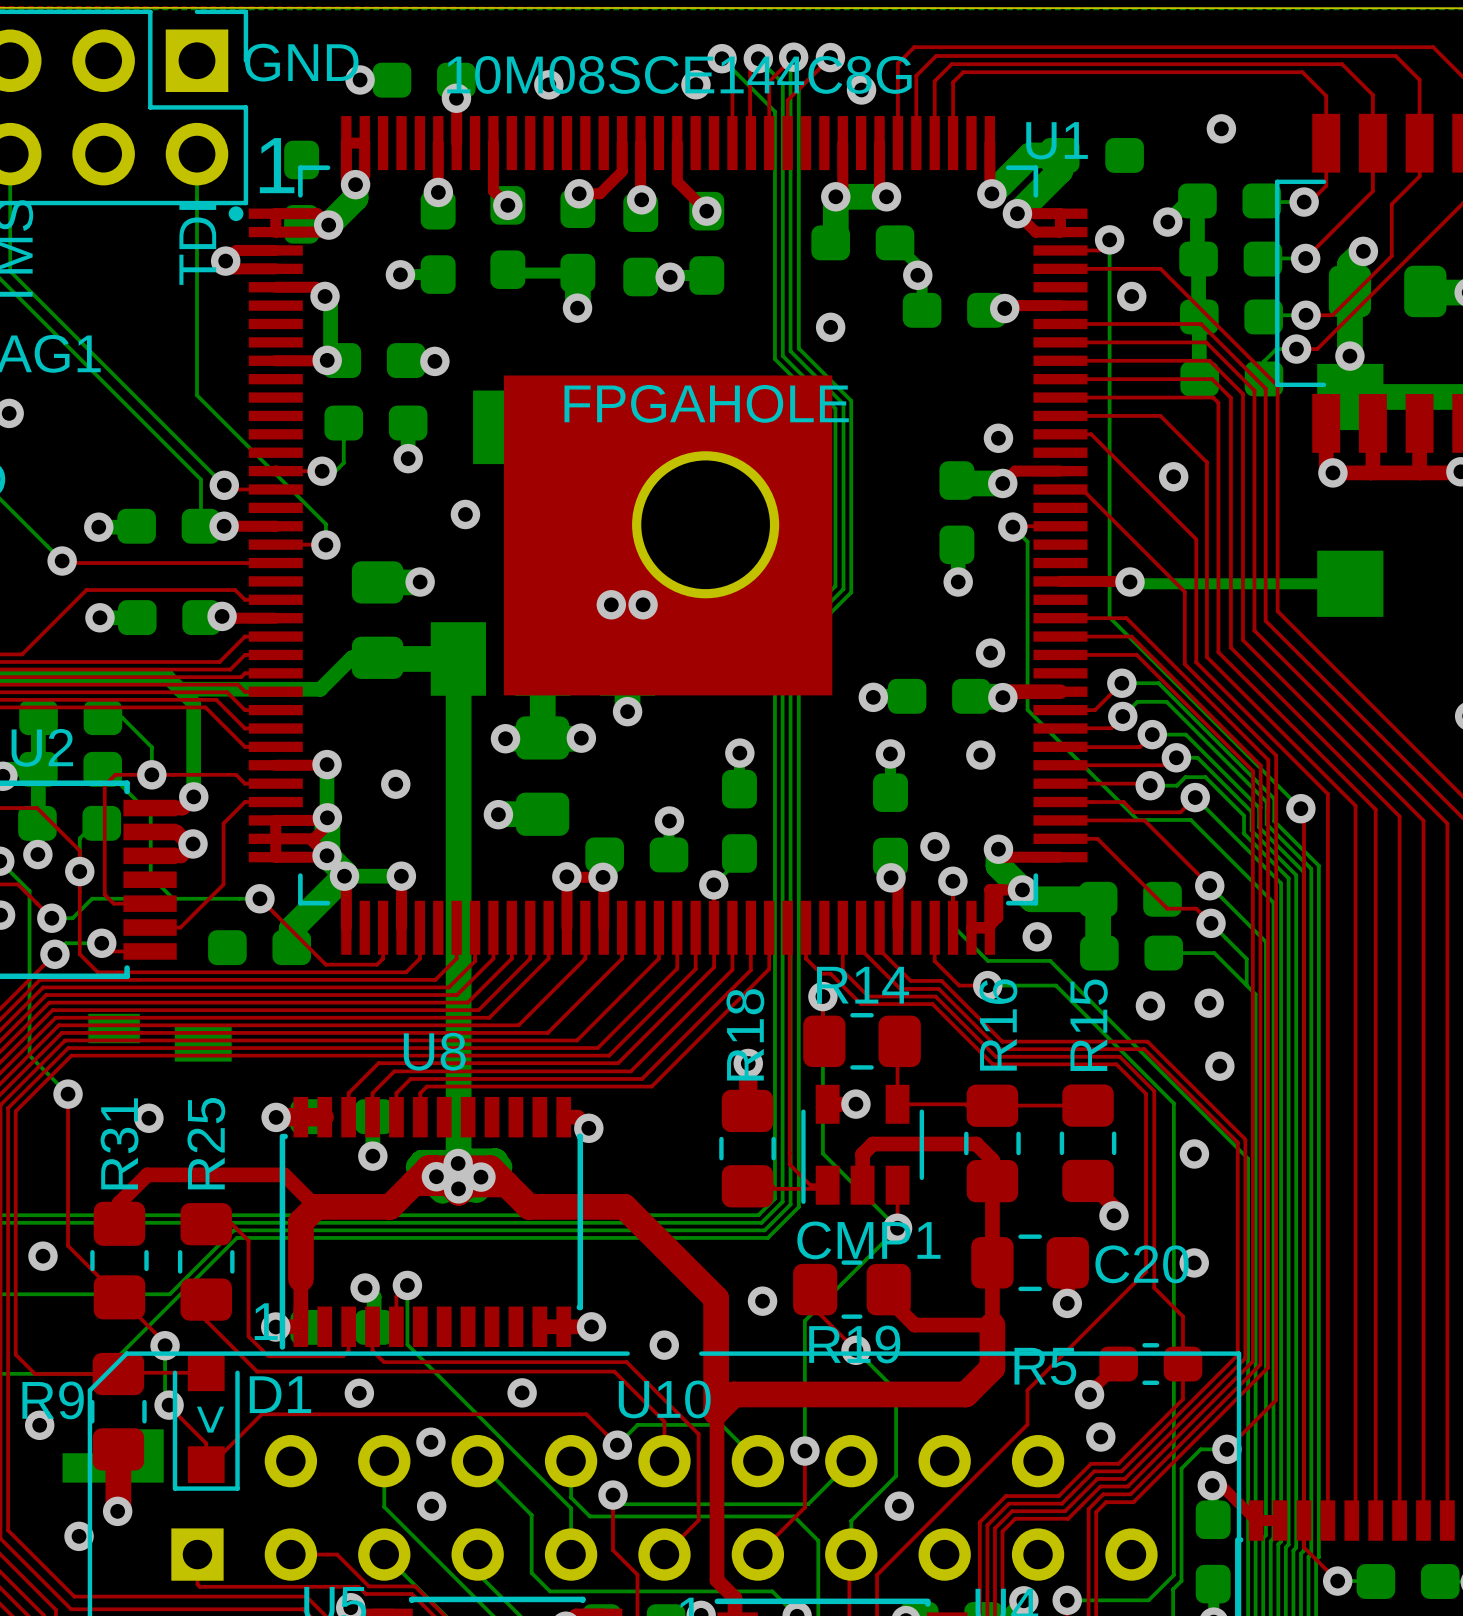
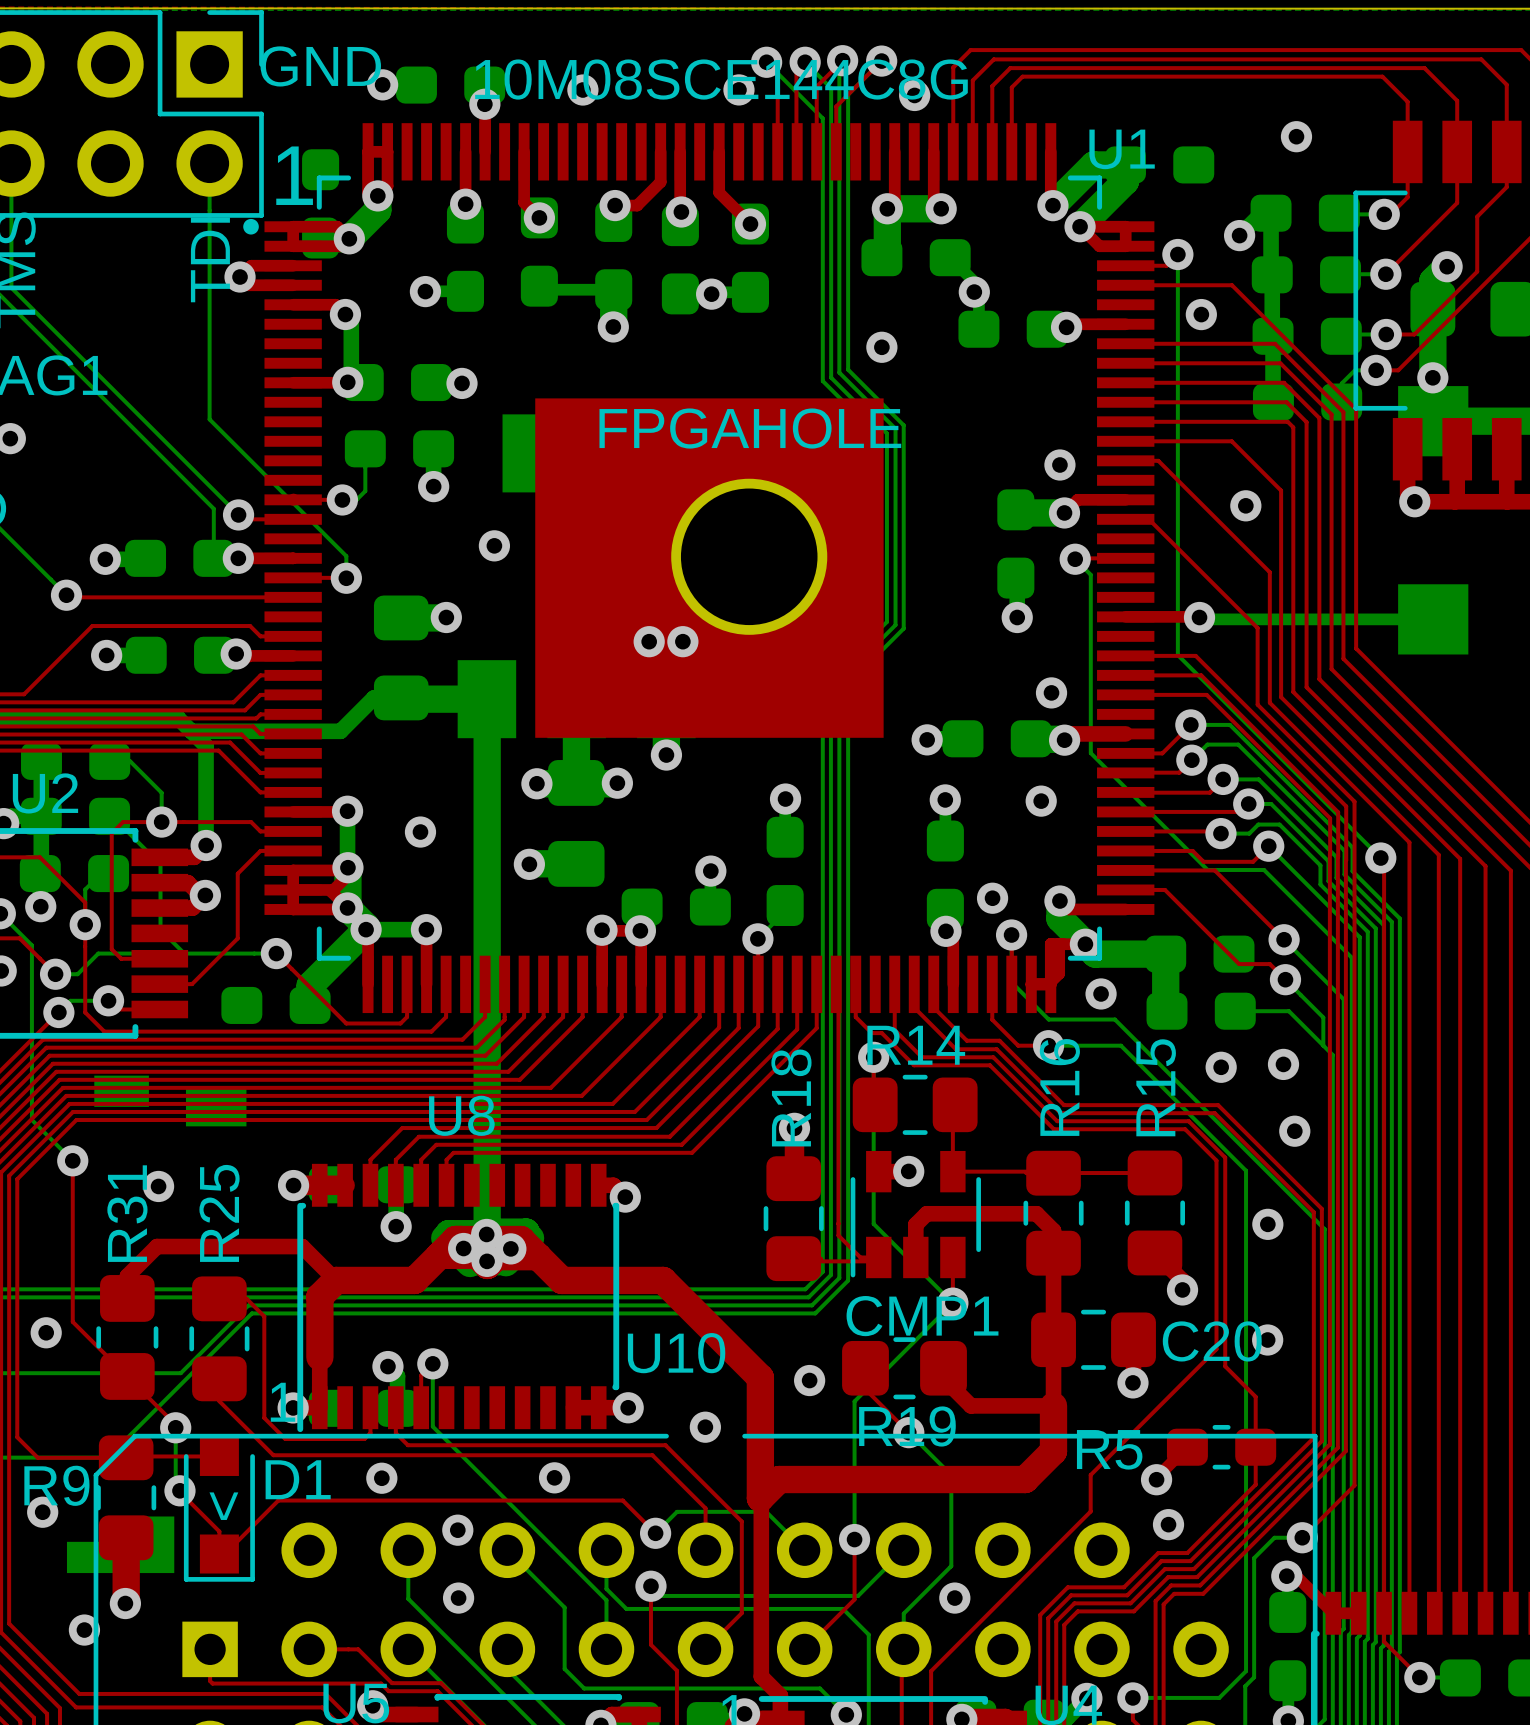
U10 name position: U10 (664, 1399) -> U10 (676, 1353)

